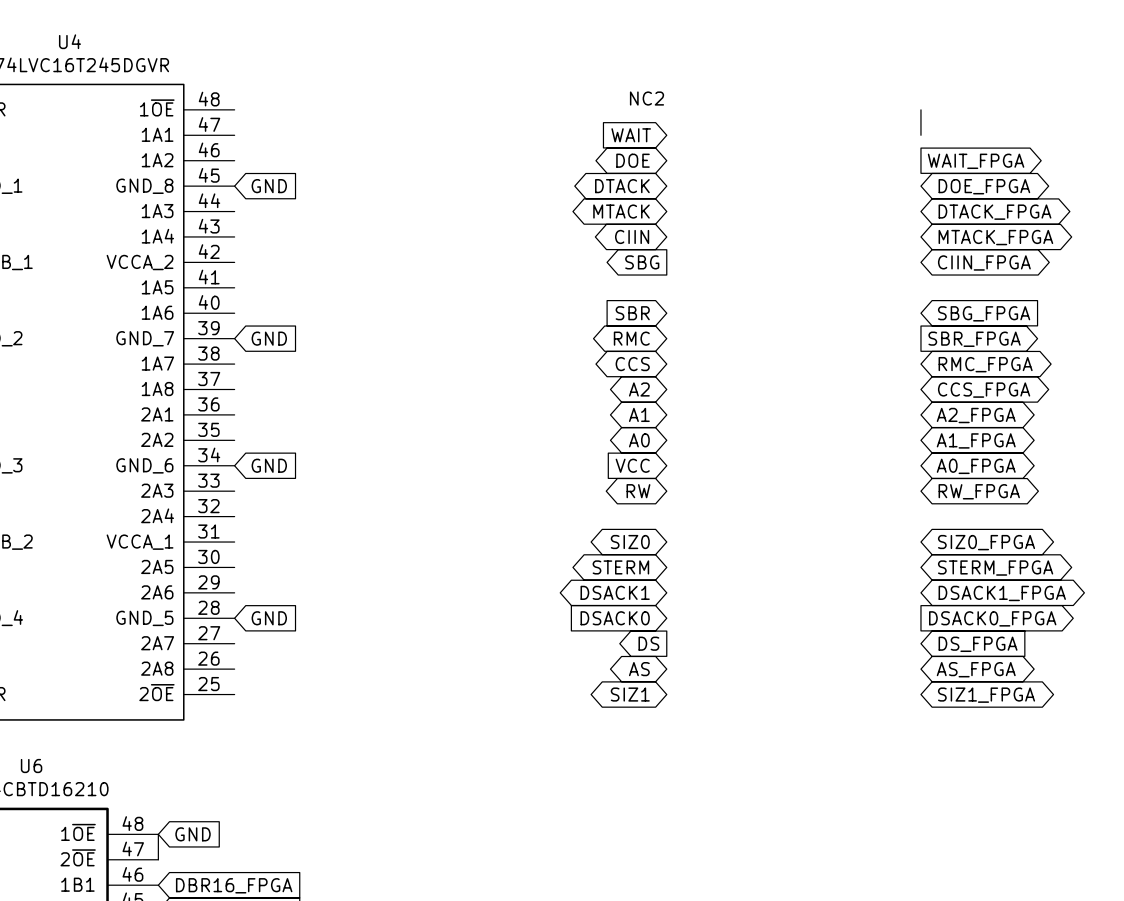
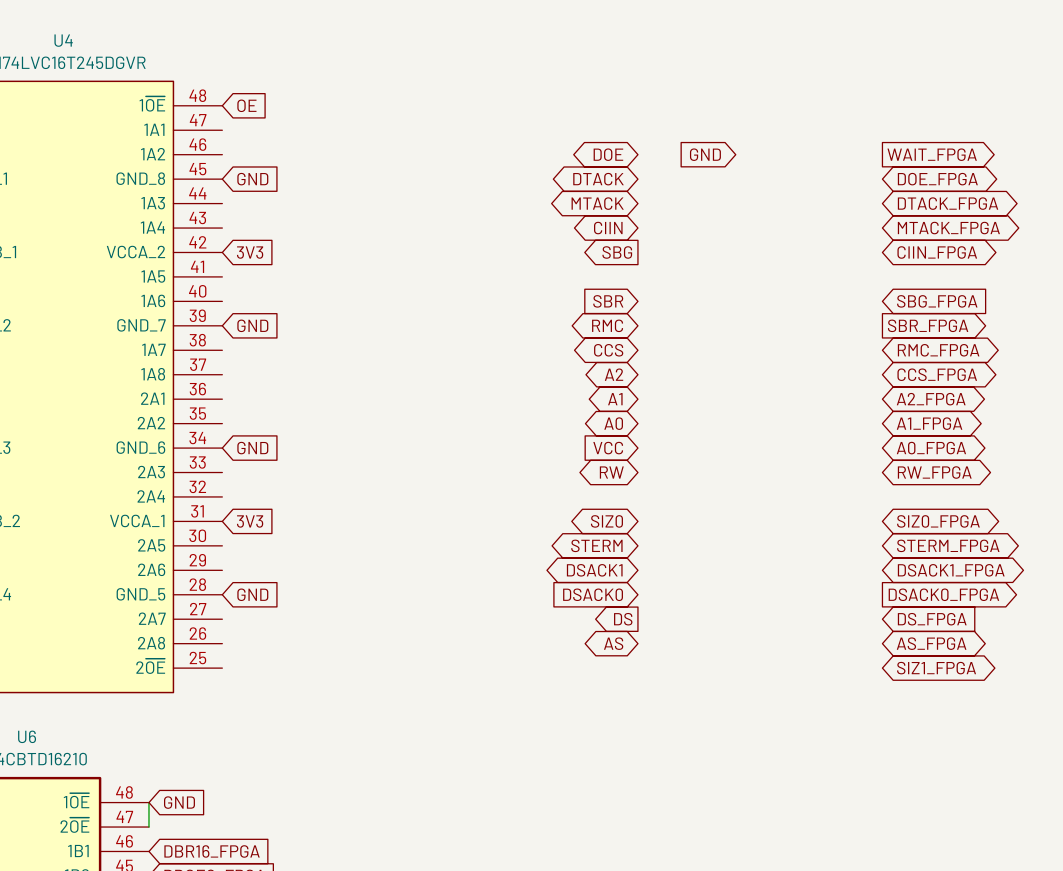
label: NC2 (647, 98) -> none
global label: none -> OE (246, 105)
wire: (920, 109) (920, 135) -> none
global label: WAIT (631, 135) -> none
global label: none -> GND (705, 154)
global label: none -> 3V3 (250, 252)
global label: none -> 3V3 (250, 521)
global label: SIZ1 (630, 694) -> none

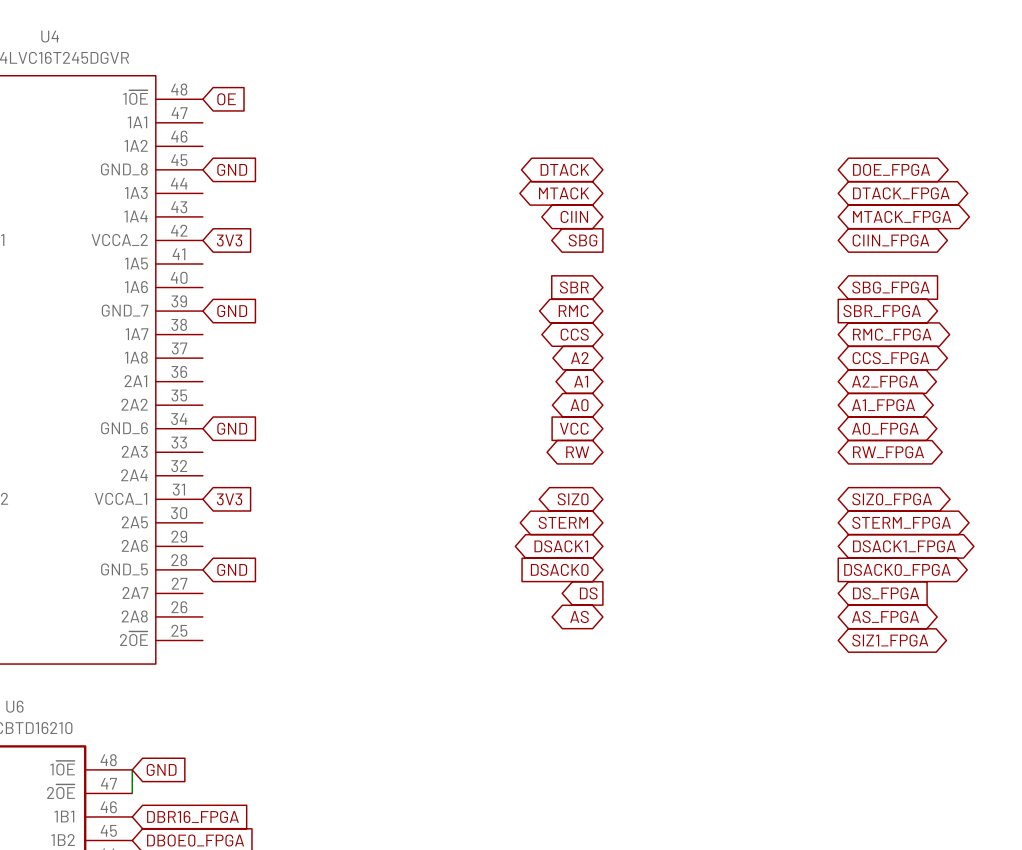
global label: DOE (608, 154) -> none
global label: GND (705, 154) -> none
global label: WAIT_FPGA (932, 154) -> none

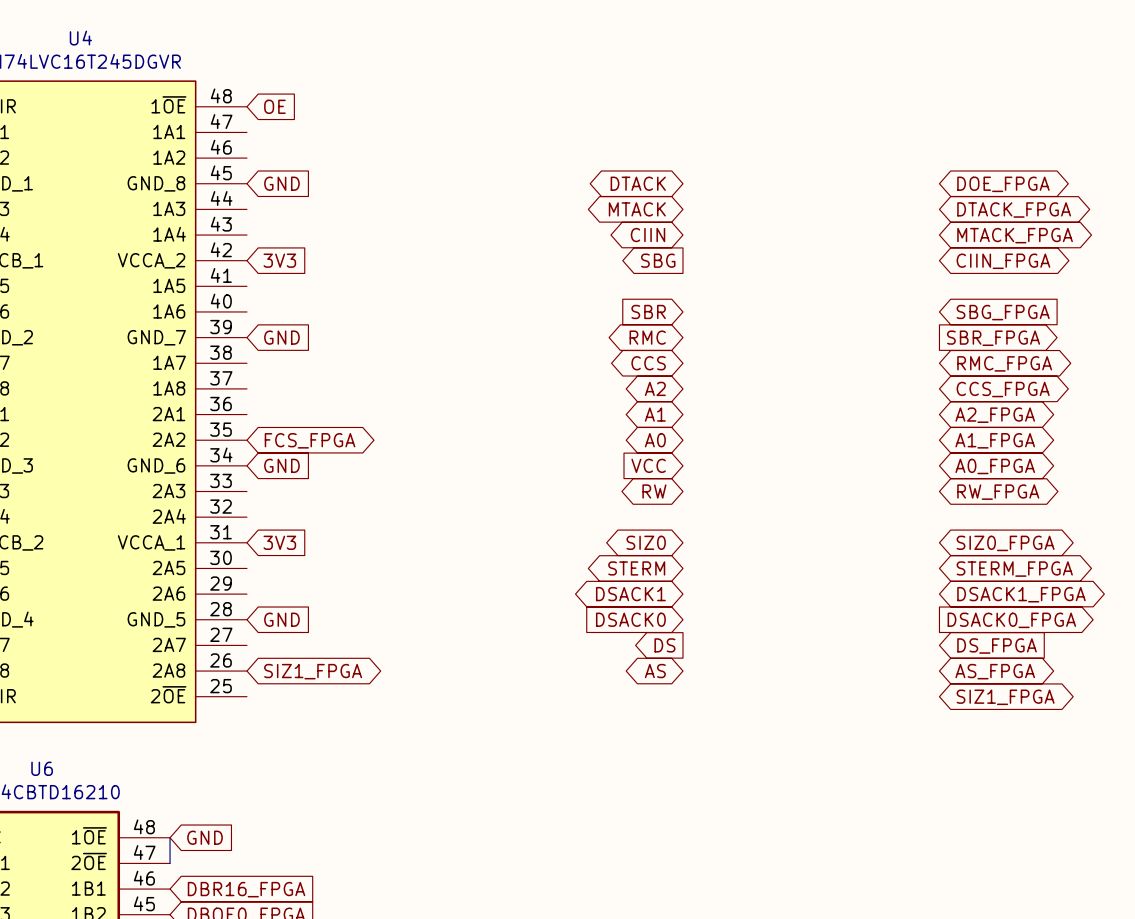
global label: none -> FCS_FPGA (310, 440)
global label: none -> SIZ1_FPGA (313, 671)

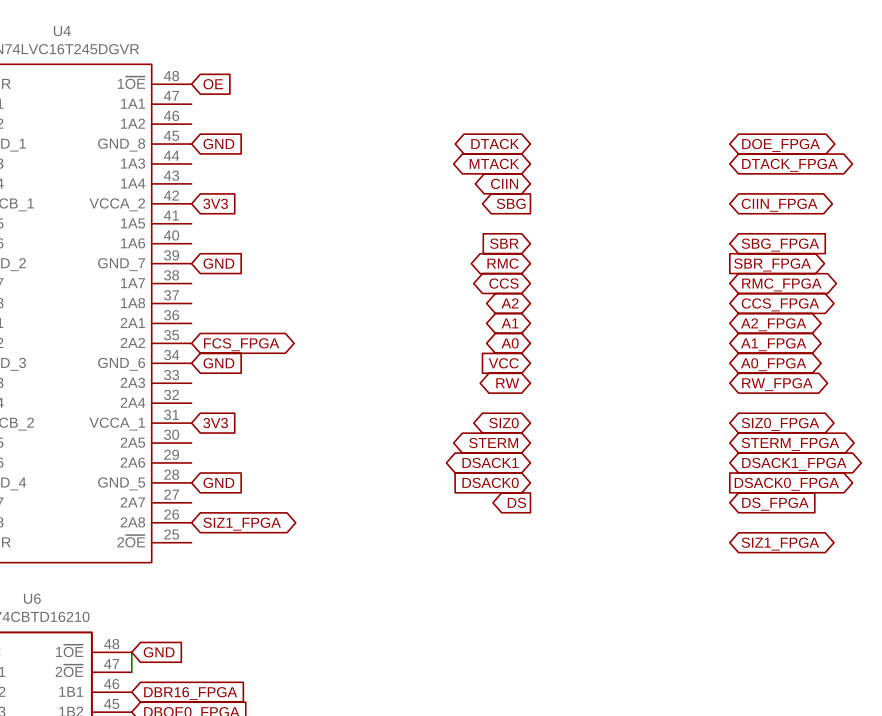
global label: MTACK_FPGA (1015, 235) -> none
global label: AS (655, 671) -> none
global label: AS_FPGA (995, 671) -> none

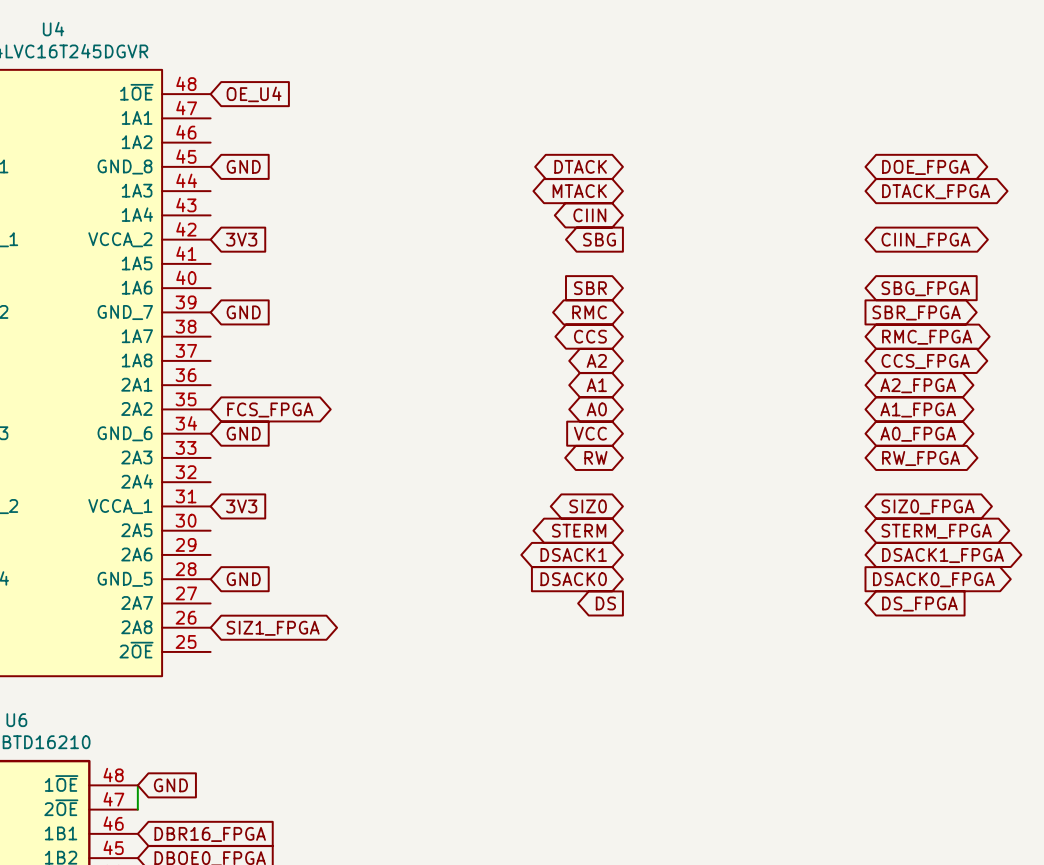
global label: OE (213, 84) -> OE_U4 (254, 94)
global label: SIZ1_FPGA (780, 544) -> none

